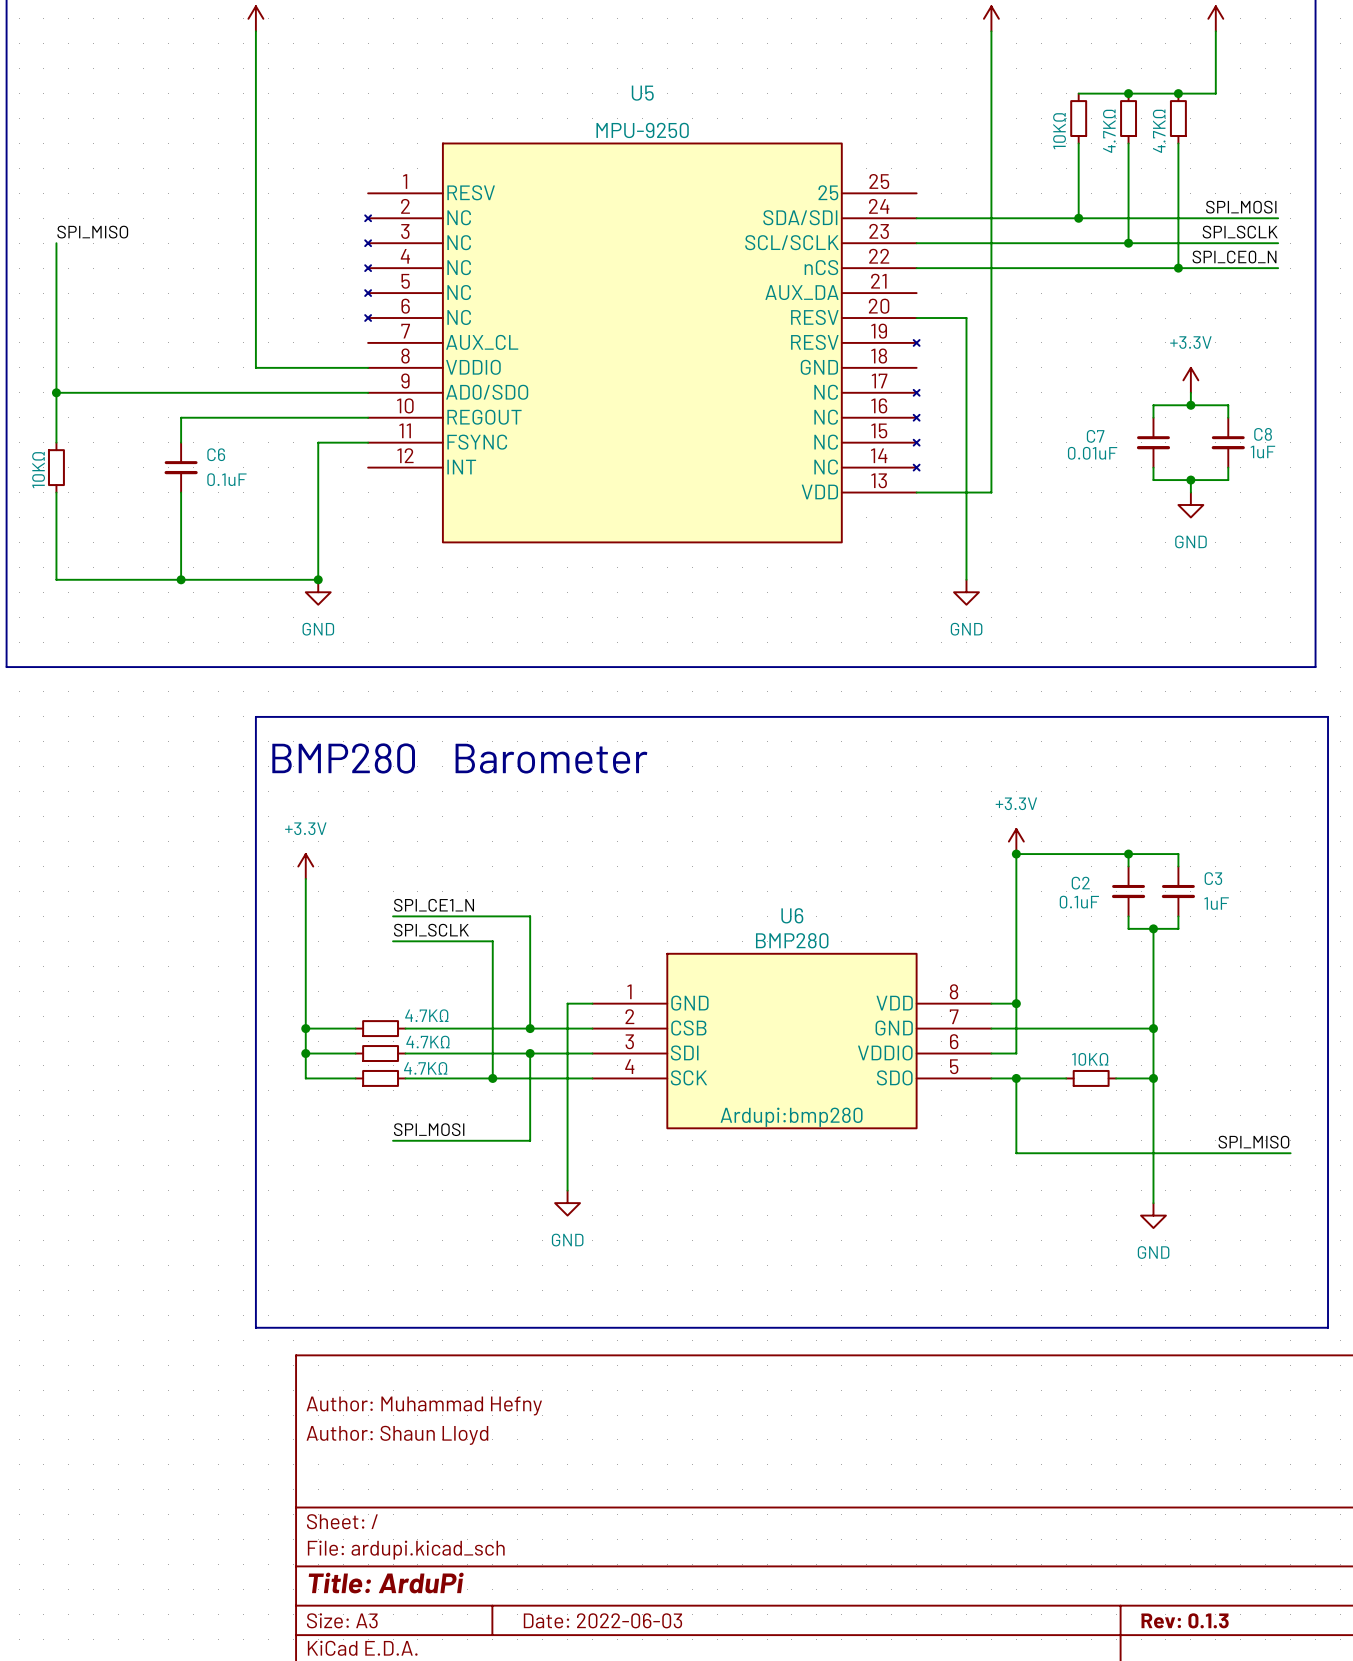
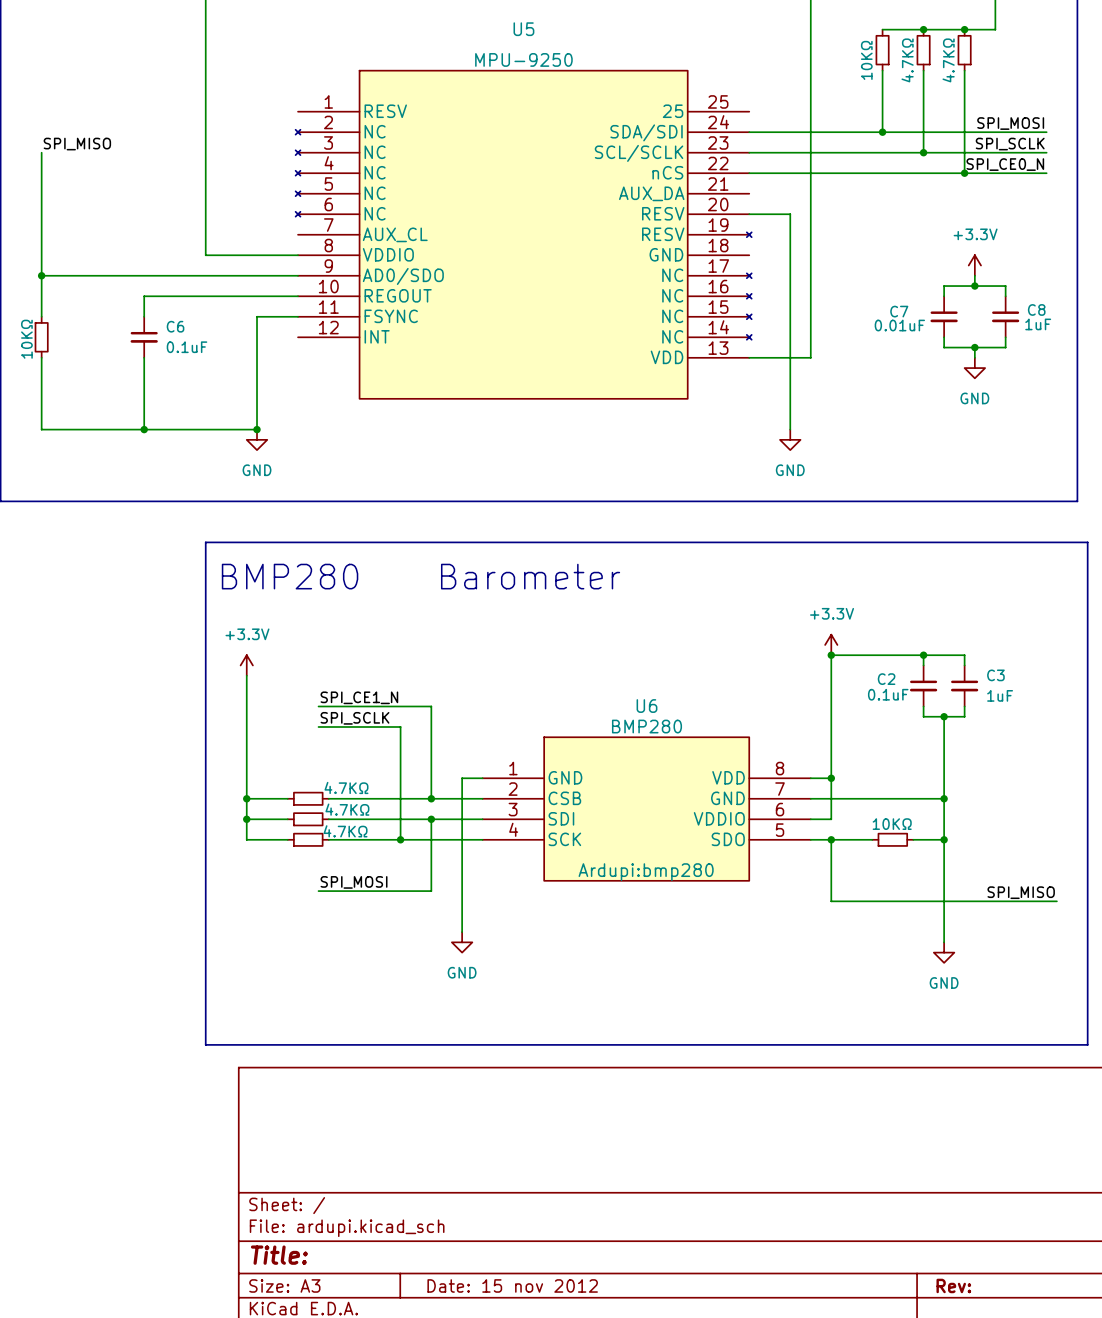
title block: Author: Muhammad Hefny (424, 1405) -> none
title block: Author: Shaun Lloyd (397, 1435) -> none
title block: Title: ArduPi (386, 1583) -> Title: (279, 1255)
title block: Date: 2022-06-03 (602, 1620) -> Date: 15 nov 2012 (512, 1285)
title block: Rev: 0.1.3 (1185, 1620) -> Rev: (953, 1285)

